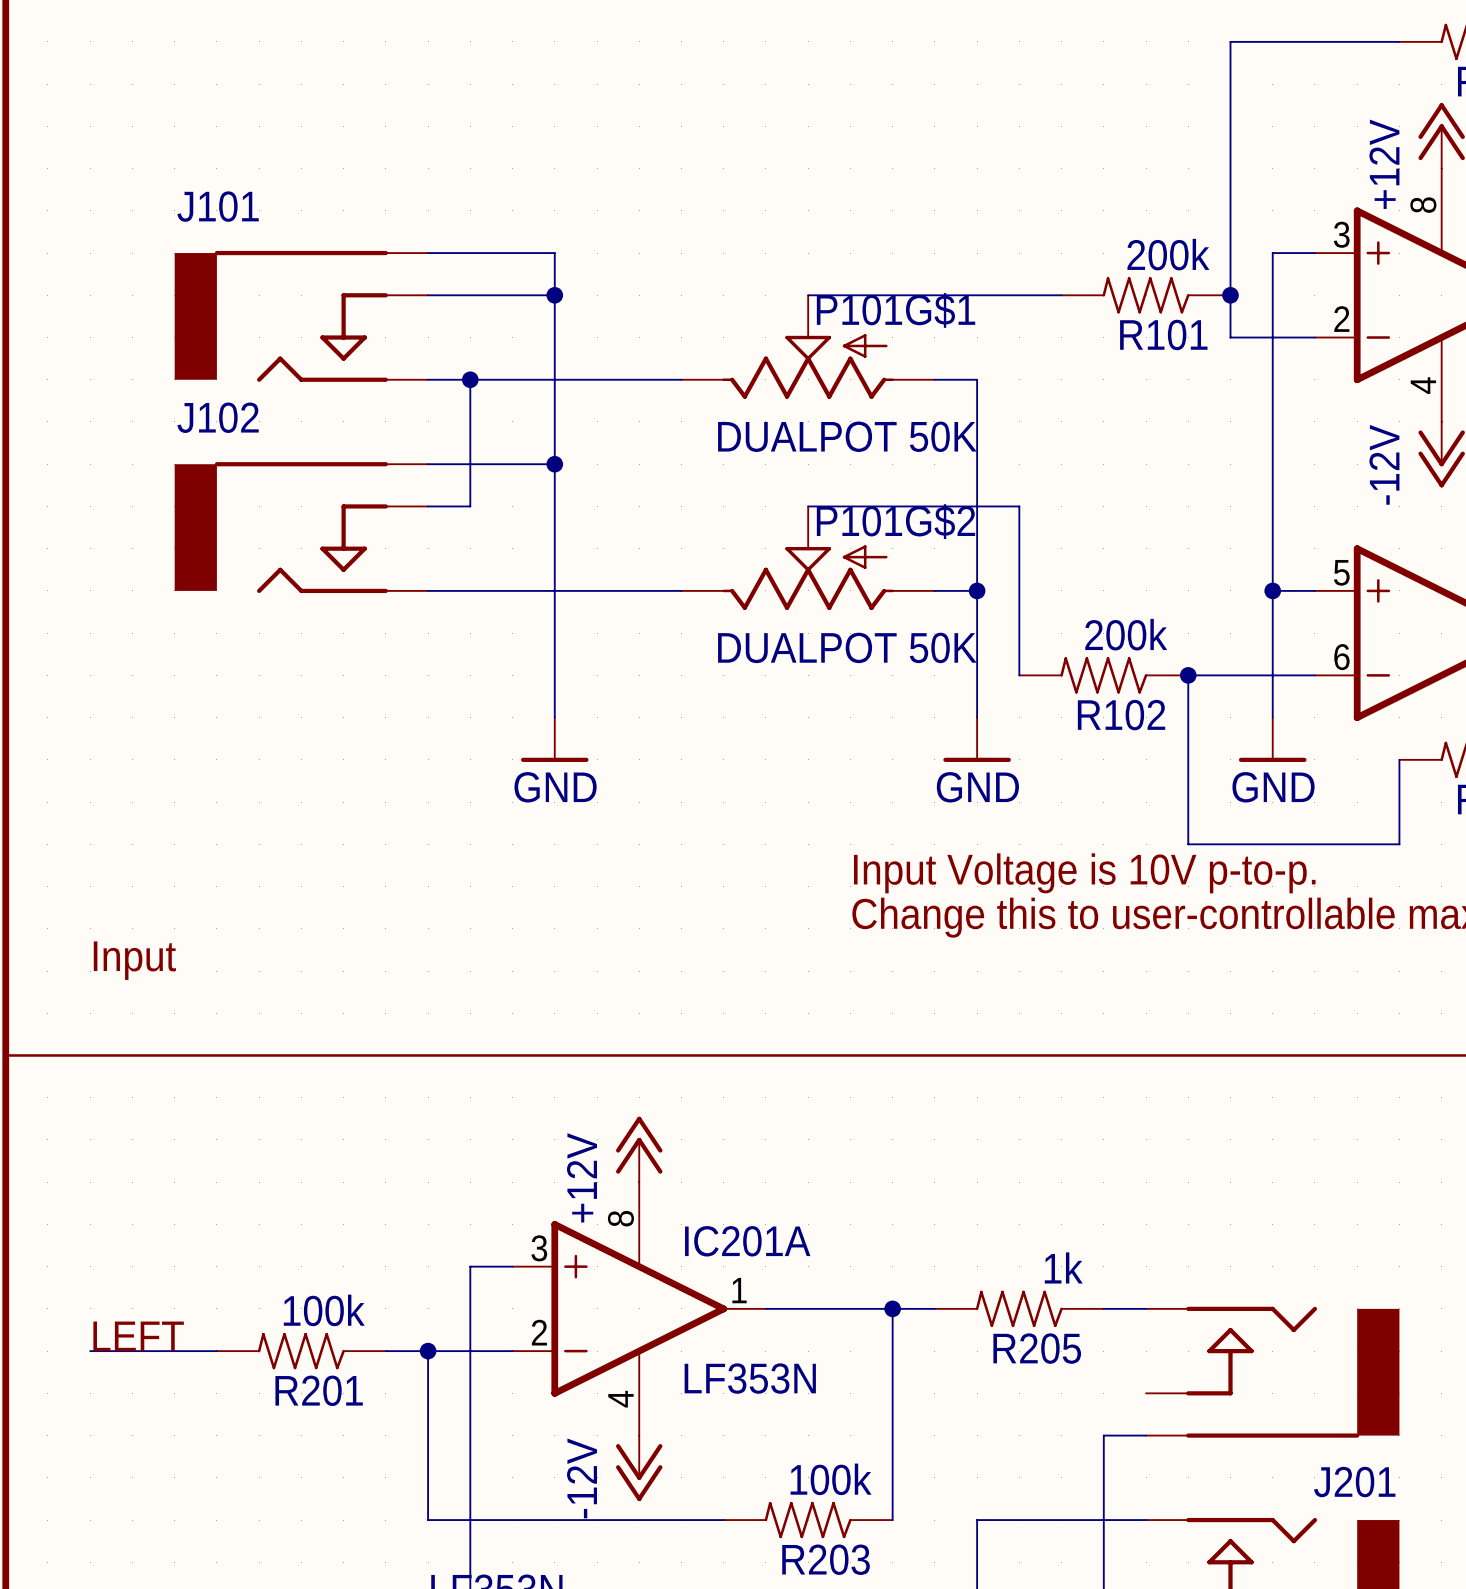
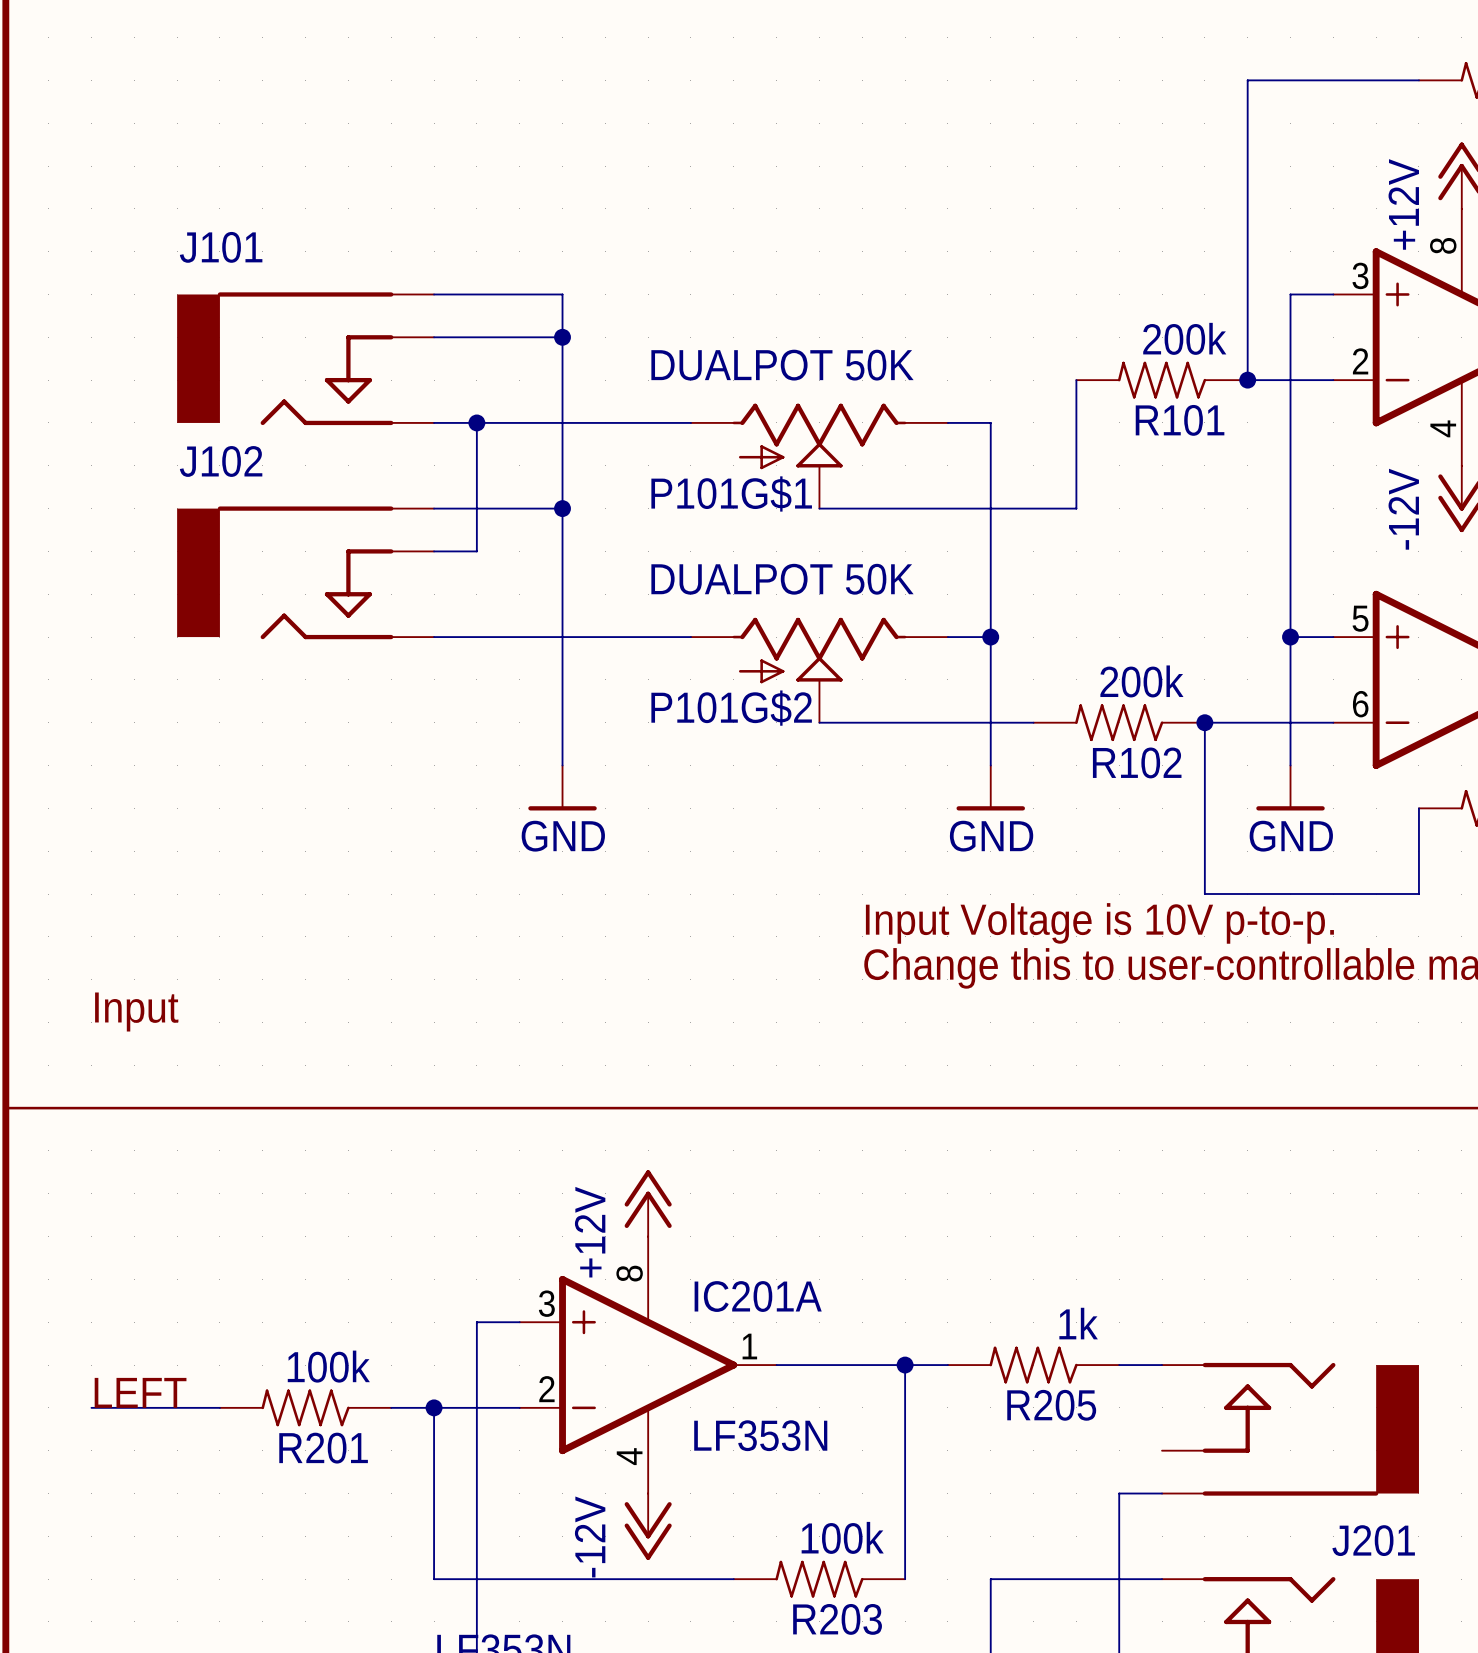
wire: (808, 295) (1061, 295) -> none
R101 position: (1146, 295) -> (1162, 380)
junction position: (1230, 295) -> (1247, 380)
wire: none -> (1076, 380) (1076, 508) (819, 508)
P101G$1 rotation: 0° (808, 366) -> 180° (819, 436)
wire: (808, 506) (1019, 506) (1019, 675) -> (819, 722) (1033, 722)
P101G$2 rotation: 0° (808, 577) -> 180° (819, 650)

